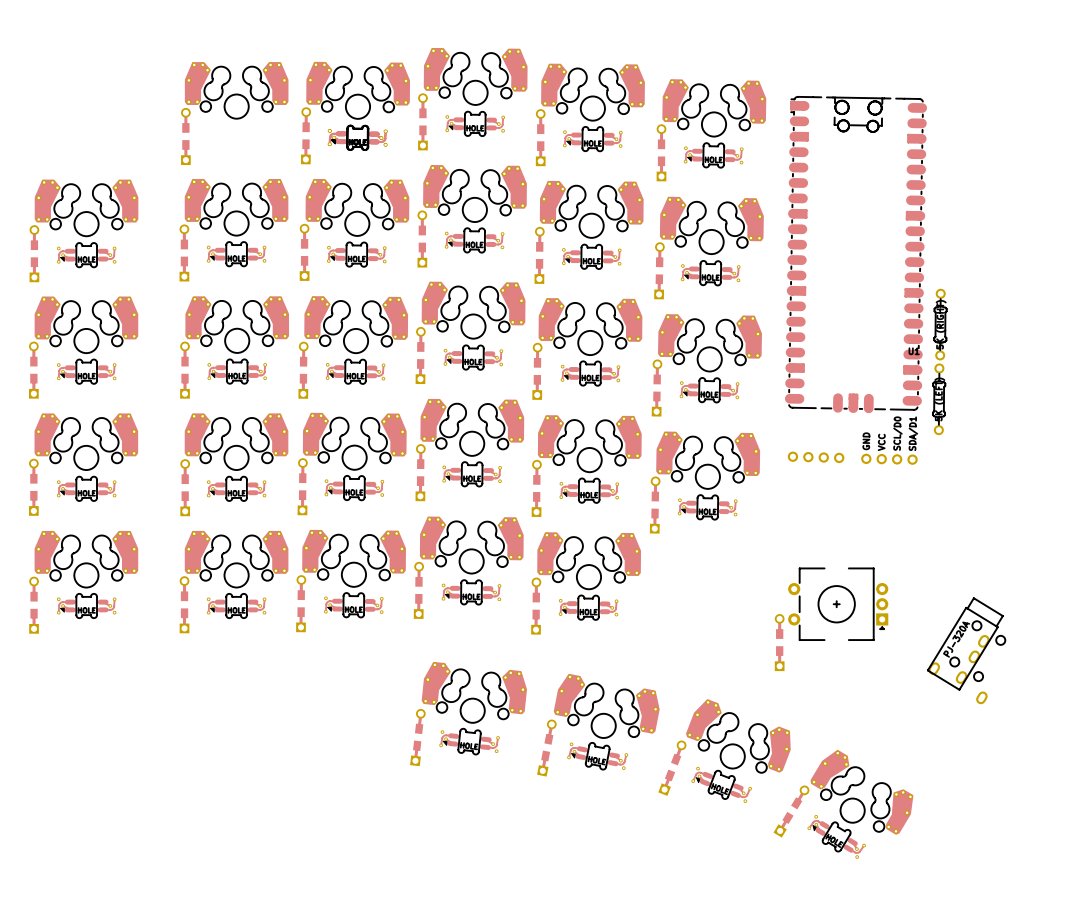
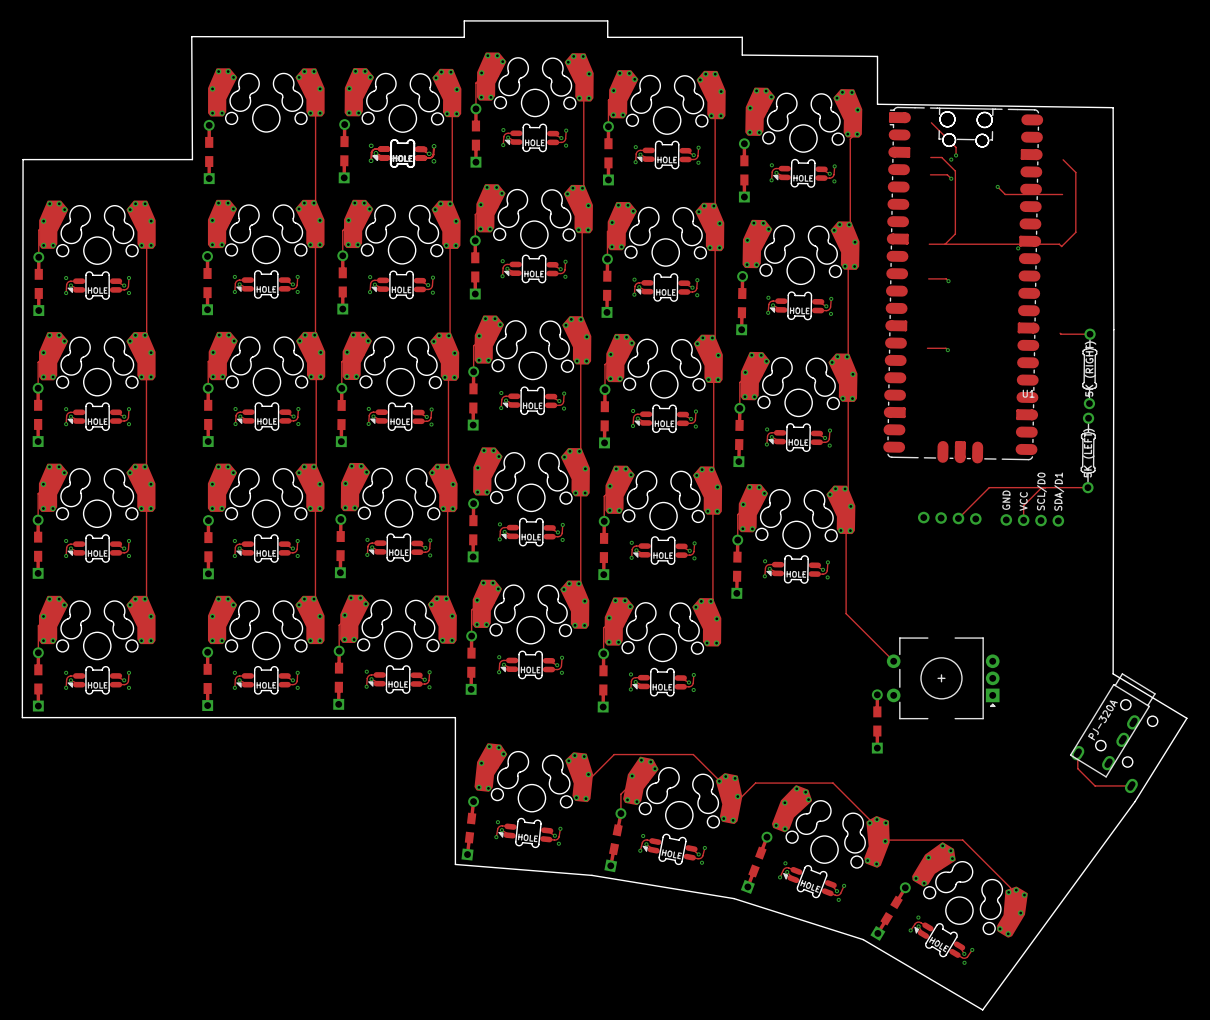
board edge: none -> (464, 20) (464, 37) (191, 36) (192, 159) (23, 159) (22, 717) (455, 717) (455, 864) (592, 875) (734, 898) (863, 939) (982, 1009) (1135, 801) (1186, 718) (1113, 673) (1113, 107) (877, 104) (877, 56) (742, 55) (742, 37) (607, 37) (607, 20) (464, 20)
track: none -> (491, 67) (475, 83) (475, 108)
track: none -> (584, 86) (580, 355) (580, 613)
track: none -> (623, 85) (608, 100) (608, 126)
track: none -> (315, 101) (315, 628)
track: none -> (452, 101) (452, 217) (456, 221)
track: none -> (716, 103) (712, 630)
track: none -> (853, 122) (853, 136) (850, 138) (850, 261) (848, 263) (848, 516) (846, 518) (846, 613) (893, 661)
track: none -> (931, 122) (956, 147) (956, 155)
via: none -> (956, 155)
track: none -> (930, 157) (941, 157) (955, 171) (955, 233) (945, 244)
via: none -> (951, 159)
track: none -> (1063, 159) (1075, 172) (1075, 232) (1061, 246) (1059, 244) (929, 244)
track: none -> (930, 174) (947, 174) (951, 178)
via: none -> (951, 178)
track: none -> (997, 186) (1005, 194) (1062, 194)
via: none -> (997, 186)
track: none -> (490, 199) (475, 214) (475, 240)
track: none -> (358, 215) (342, 230) (342, 255)
track: none -> (53, 216) (38, 230) (38, 257)
track: none -> (621, 217) (607, 231) (607, 259)
track: none -> (146, 233) (146, 496)
track: none -> (451, 233) (450, 365) (448, 366) (447, 628)
via: none -> (1018, 248)
track: none -> (928, 278) (946, 278) (948, 281)
via: none -> (948, 281)
track: none -> (488, 330) (473, 345) (473, 371)
track: none -> (1060, 333) (1090, 334)
track: none -> (356, 347) (341, 361) (341, 388)
track: none -> (52, 347) (38, 362) (38, 388)
track: none -> (222, 347) (208, 361) (208, 388)
track: none -> (927, 348) (946, 348) (947, 350)
track: none -> (620, 349) (605, 364) (605, 389)
via: none -> (947, 350)
part position: (940, 324) -> (1089, 368)
track: none -> (754, 367) (739, 382) (739, 408)
part position: (939, 399) -> (1088, 452)
track: none -> (52, 479) (38, 493) (38, 520)
track: none -> (619, 481) (604, 496) (604, 521)
track: none -> (1043, 487) (1023, 505) (1023, 520)
track: none -> (1087, 487) (989, 487) (958, 518)
track: none -> (146, 496) (146, 628)
track: none -> (752, 499) (737, 514) (737, 540)
part position: (816, 457) -> (949, 518)
part position: (889, 459) -> (1032, 520)
track: none -> (486, 595) (471, 610) (471, 636)
track: none -> (354, 610) (339, 625) (339, 651)
track: none -> (52, 611) (38, 625) (38, 652)
track: none -> (618, 612) (603, 627) (603, 653)
part position: (966, 651) -> (1113, 733)
track: none -> (1077, 753) (1077, 768) (1095, 786) (1131, 785)
track: none -> (642, 772) (620, 794) (620, 813)
track: none -> (582, 786) (614, 754) (693, 754) (730, 792) (730, 807) (755, 783) (833, 783) (876, 826) (876, 851) (887, 840) (962, 840) (1010, 887) (1010, 921)

